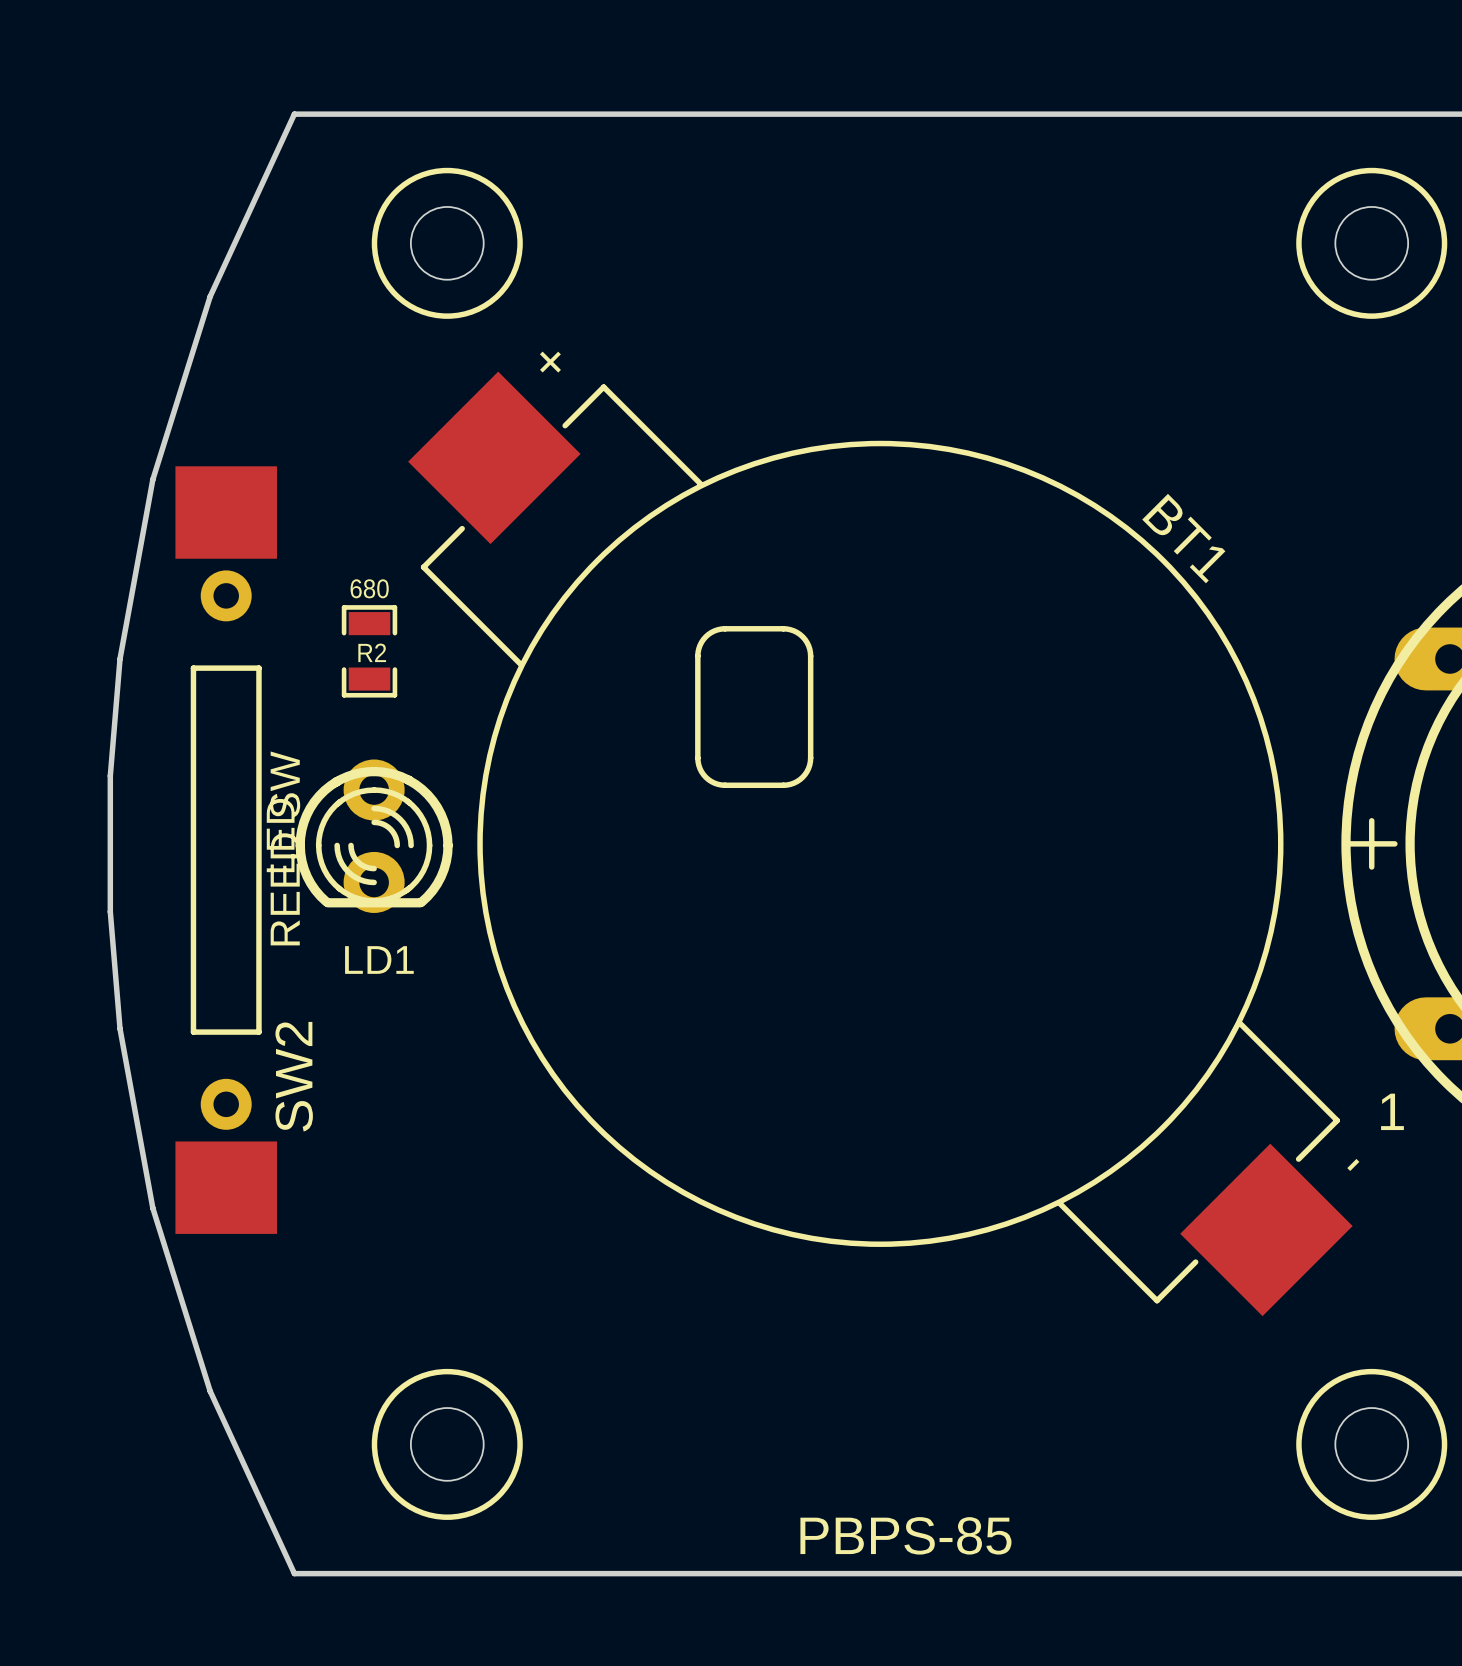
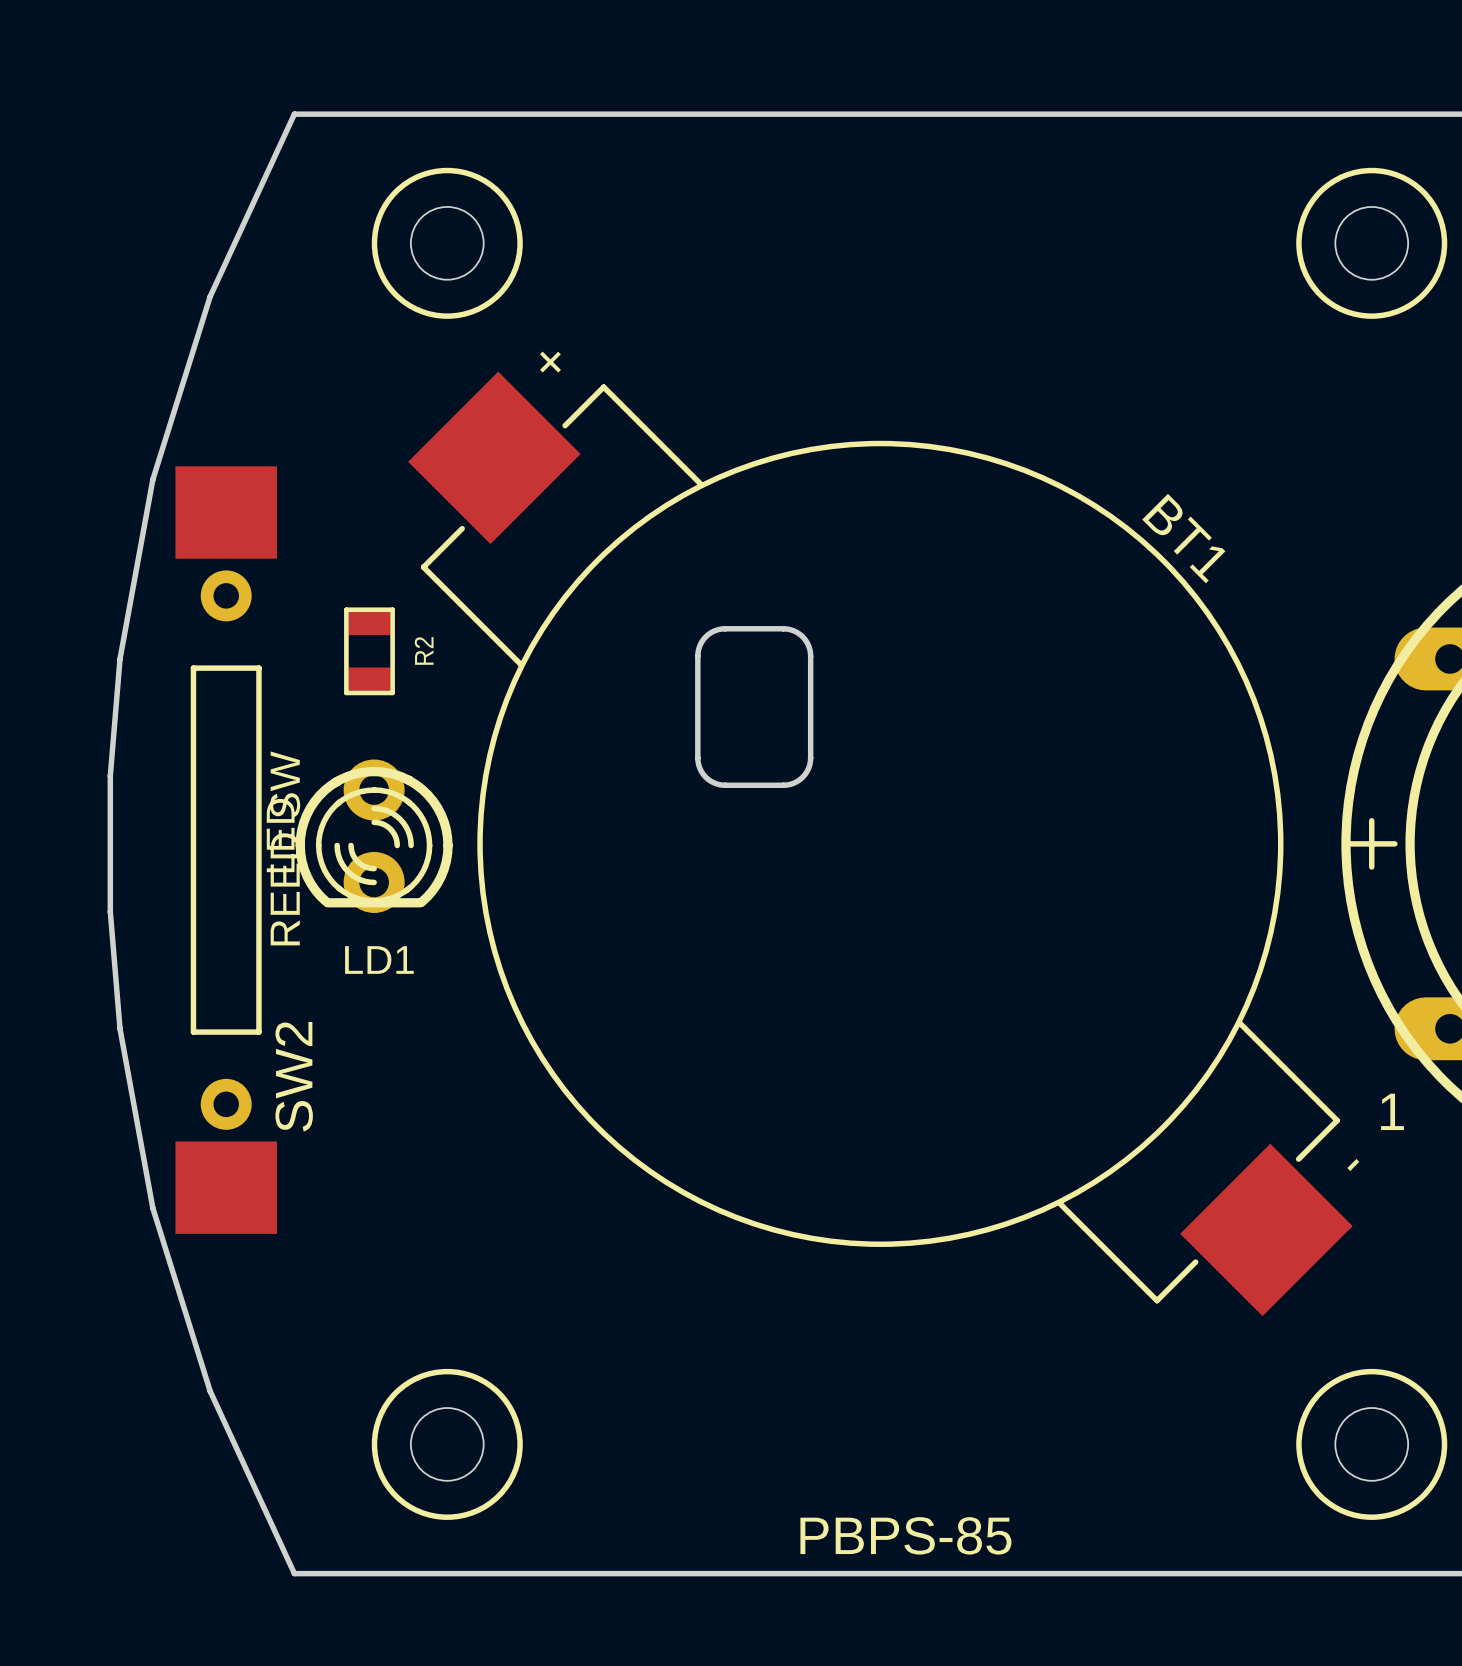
R2 value: 680 (369, 588) -> none
R2 footprint: [341, 605, 398, 698] -> [344, 607, 395, 696]
part footprint: [695, 626, 814, 789] -> [695, 626, 814, 789]
R2 name rotation: 0° (372, 652) -> 90° counterclockwise (424, 650)
R2 name position: R2 (372, 652) -> R2 (424, 650)

